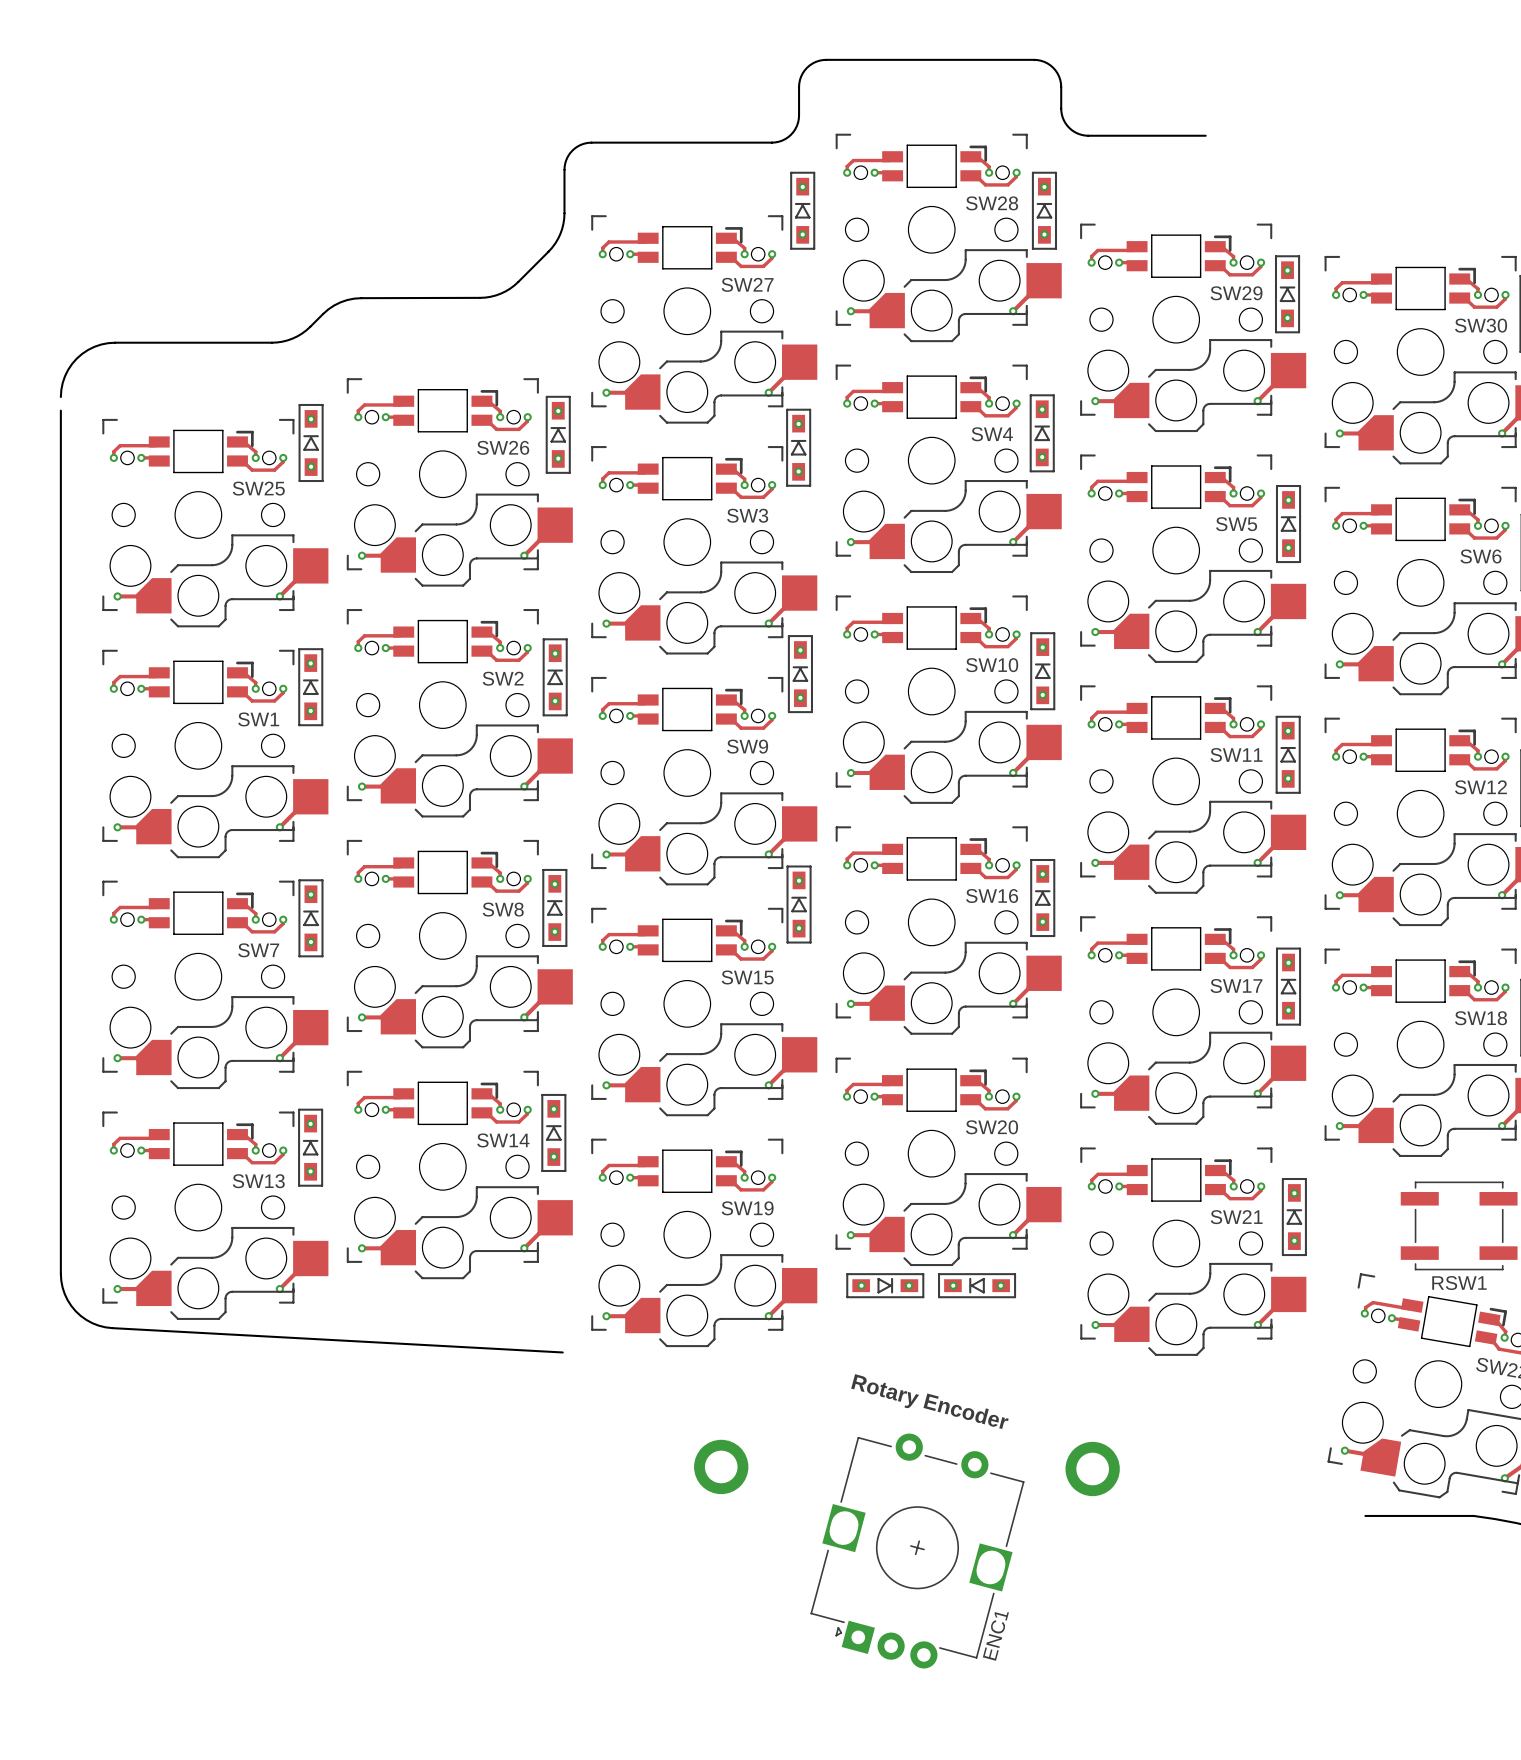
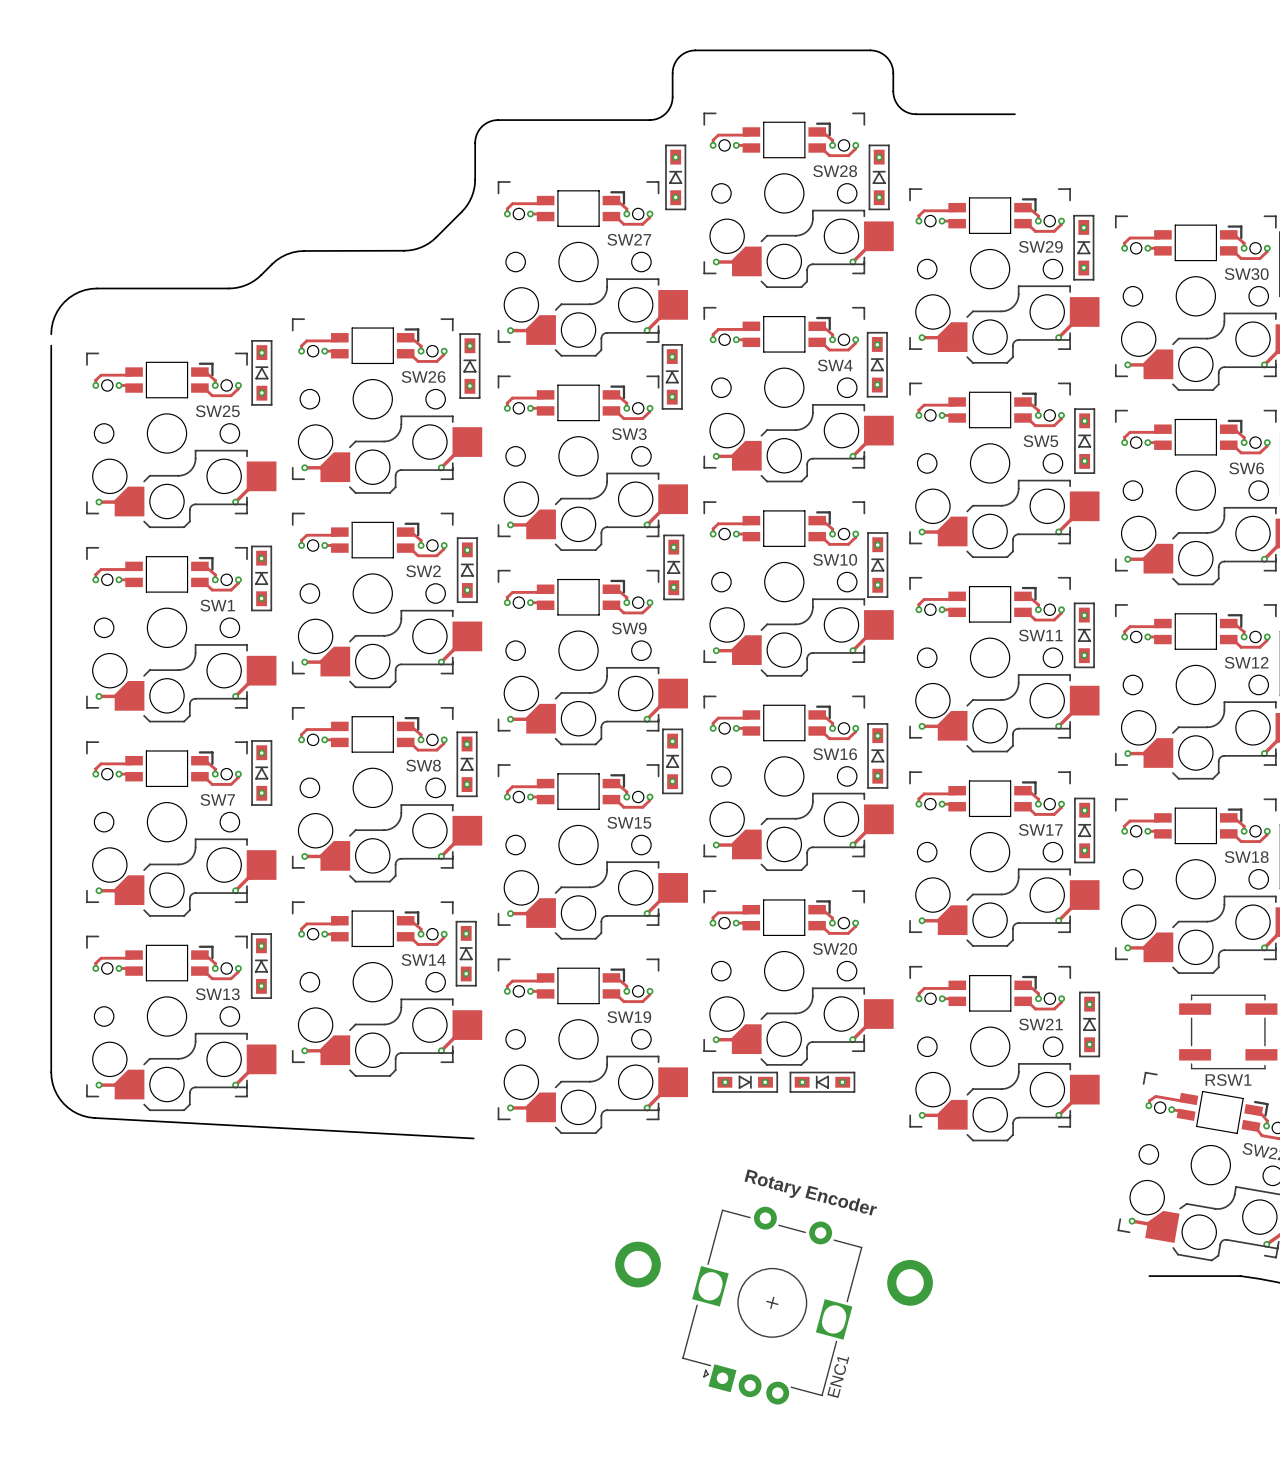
text position: Rotary Encoder (929, 1401) -> Rotary Encoder (810, 1192)
part position: (721, 1466) -> (637, 1264)
part position: (1092, 1469) -> (910, 1282)

